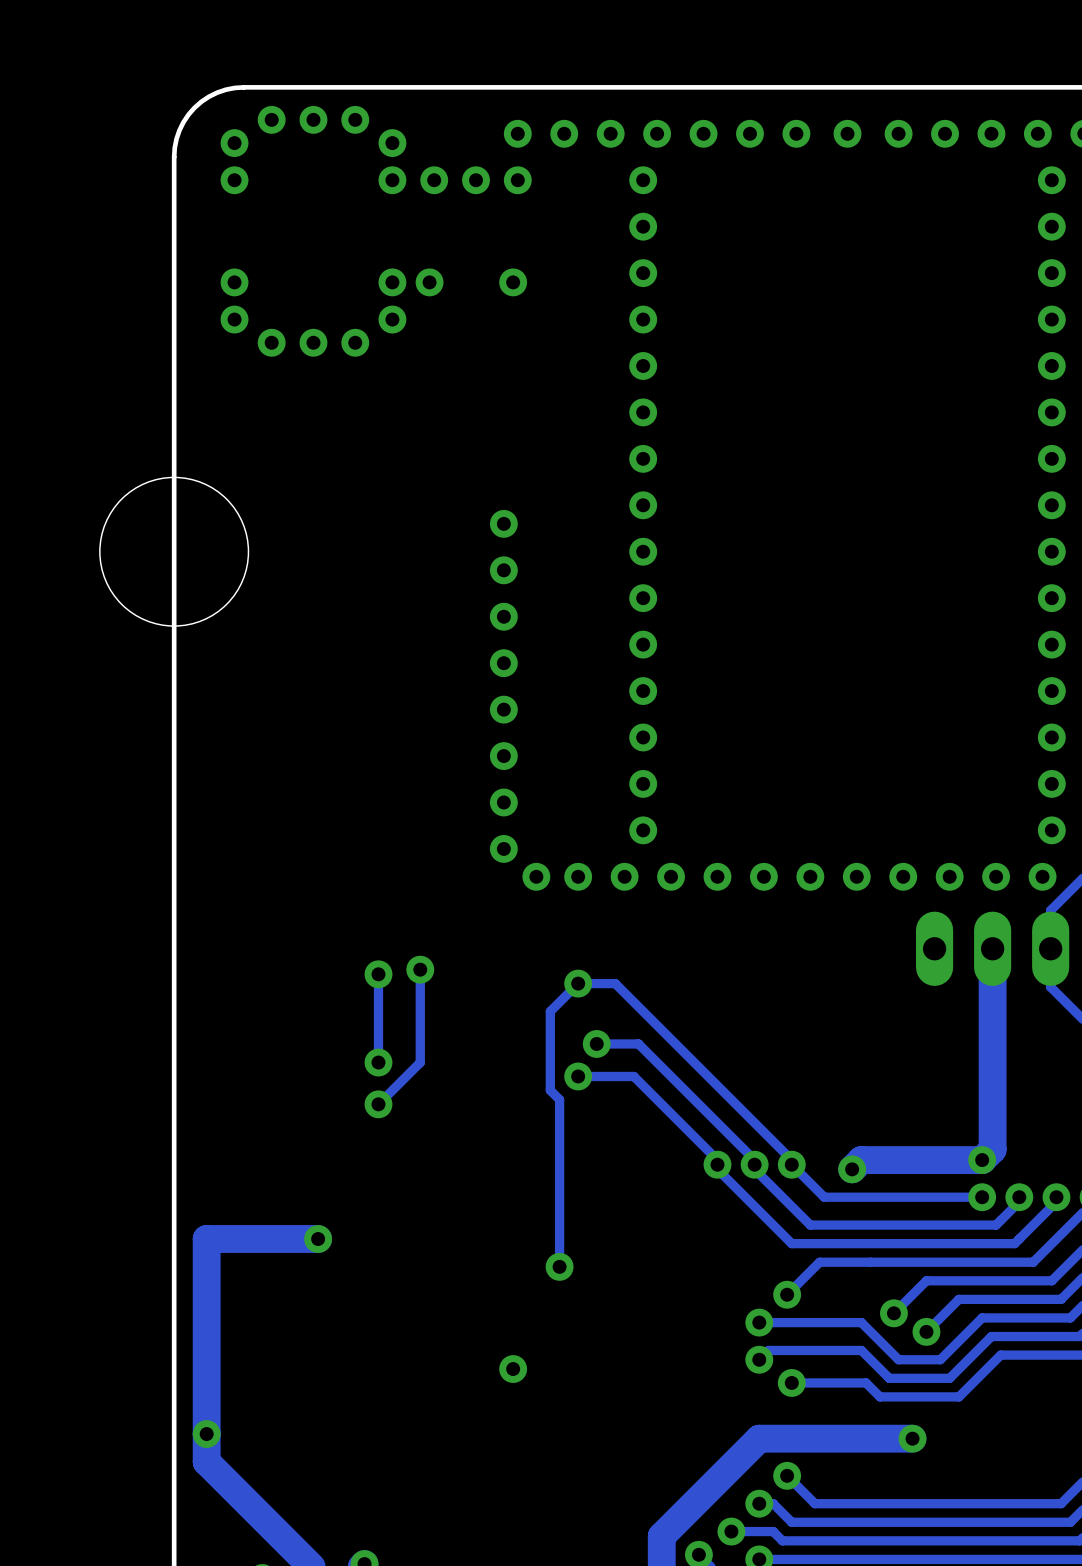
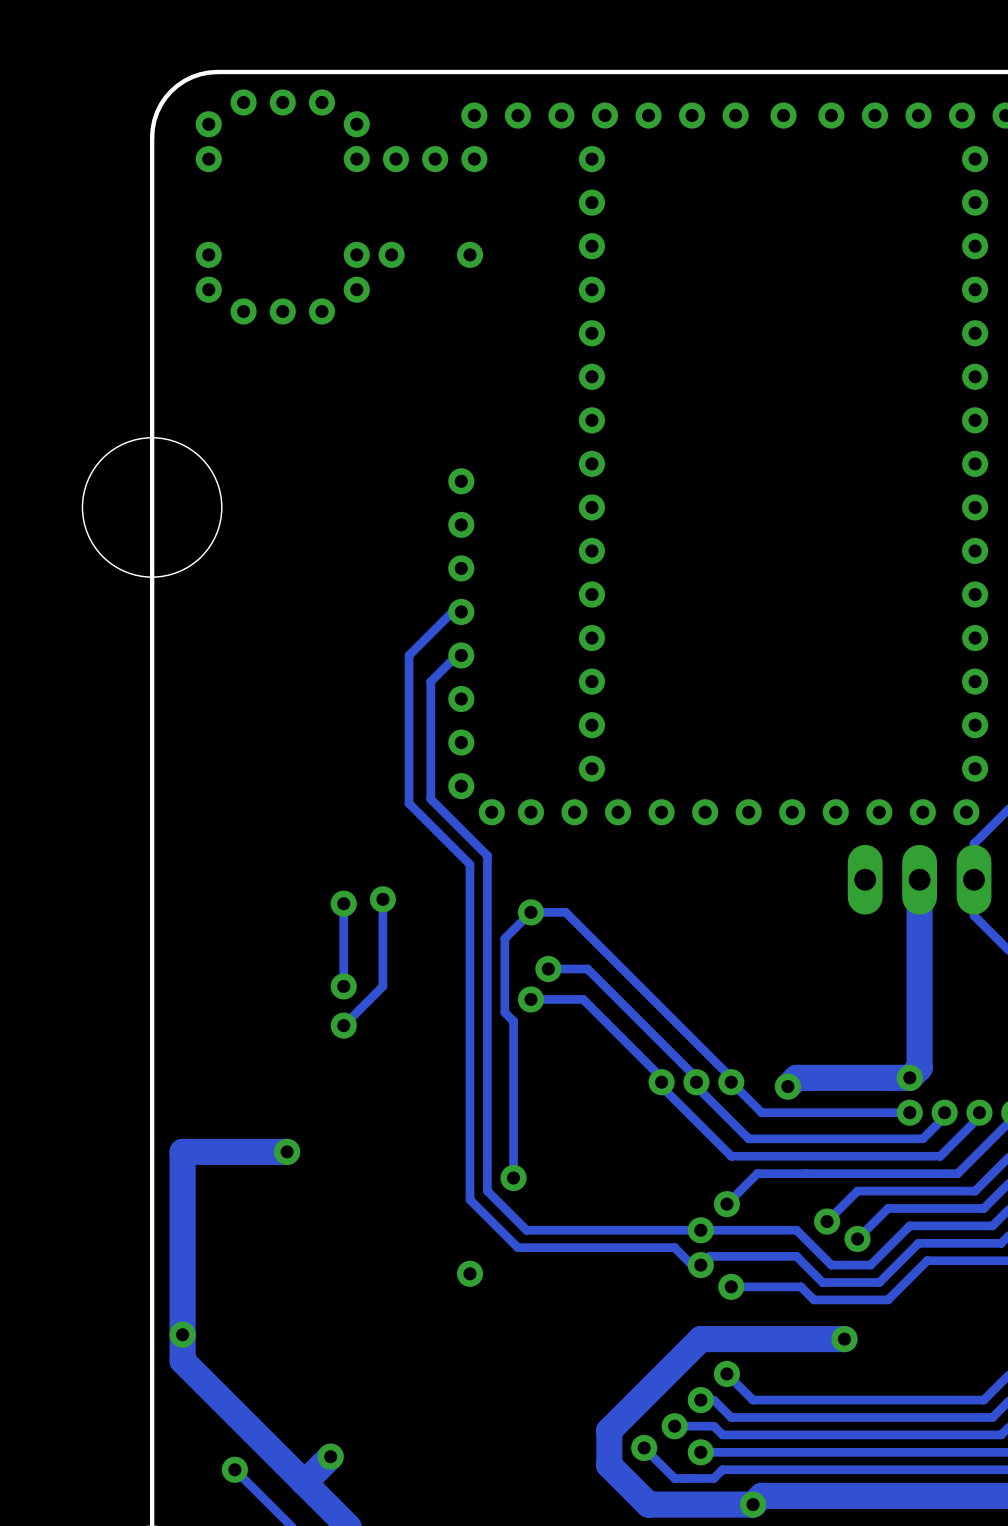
track: none -> (461, 611) (452, 611) (409, 655) (409, 803) (470, 864) (470, 1199) (517, 1247) (674, 1247) (692, 1265) (700, 1265)
track: none -> (461, 655) (456, 655) (430, 681) (430, 799) (487, 855) (487, 1191) (526, 1230) (700, 1230)

